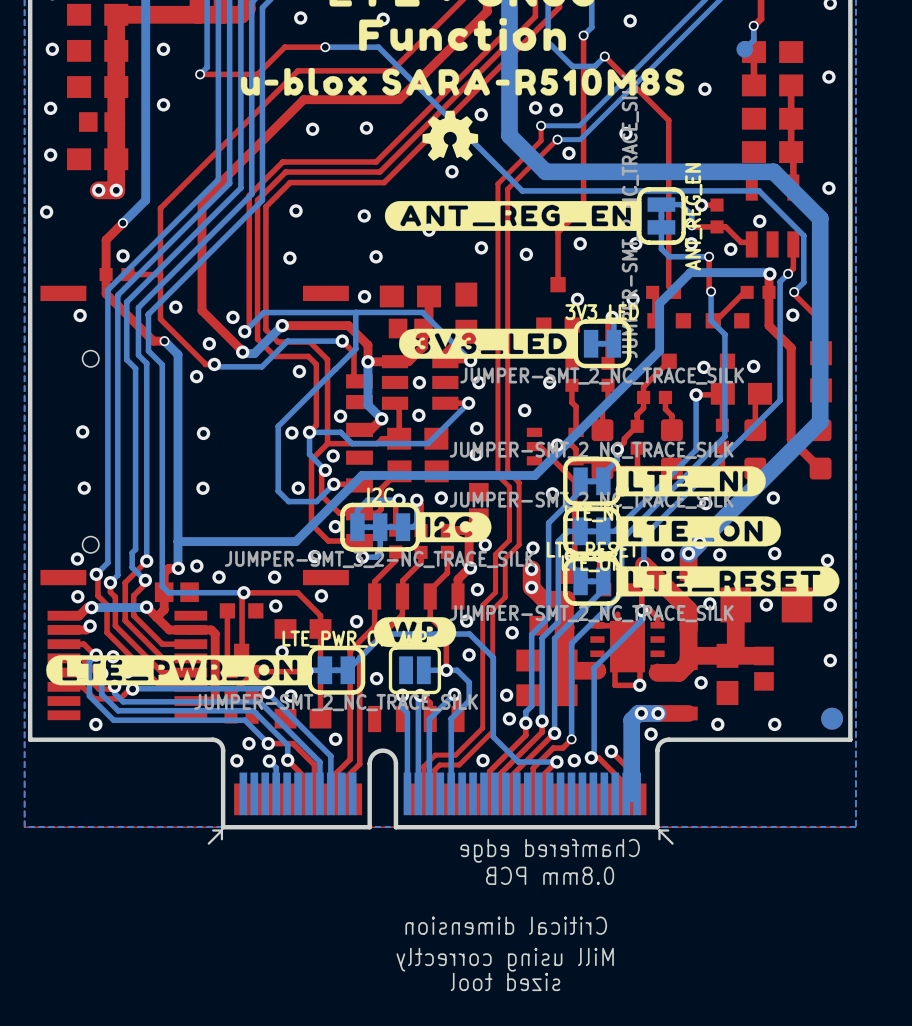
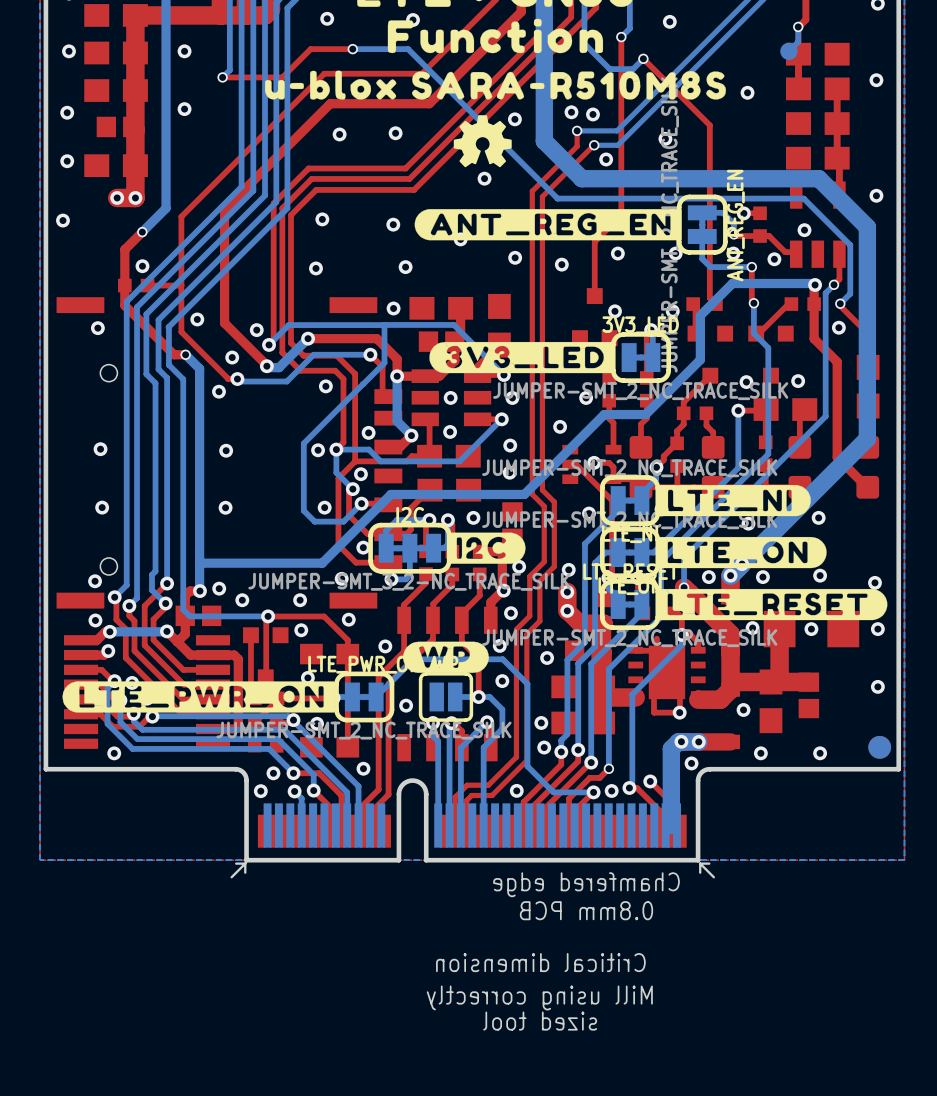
bottom track: (659, 346) (659, 350) (535, 475) (490, 475) -> (700, 359) (645, 414) (604, 414) (524, 494)

